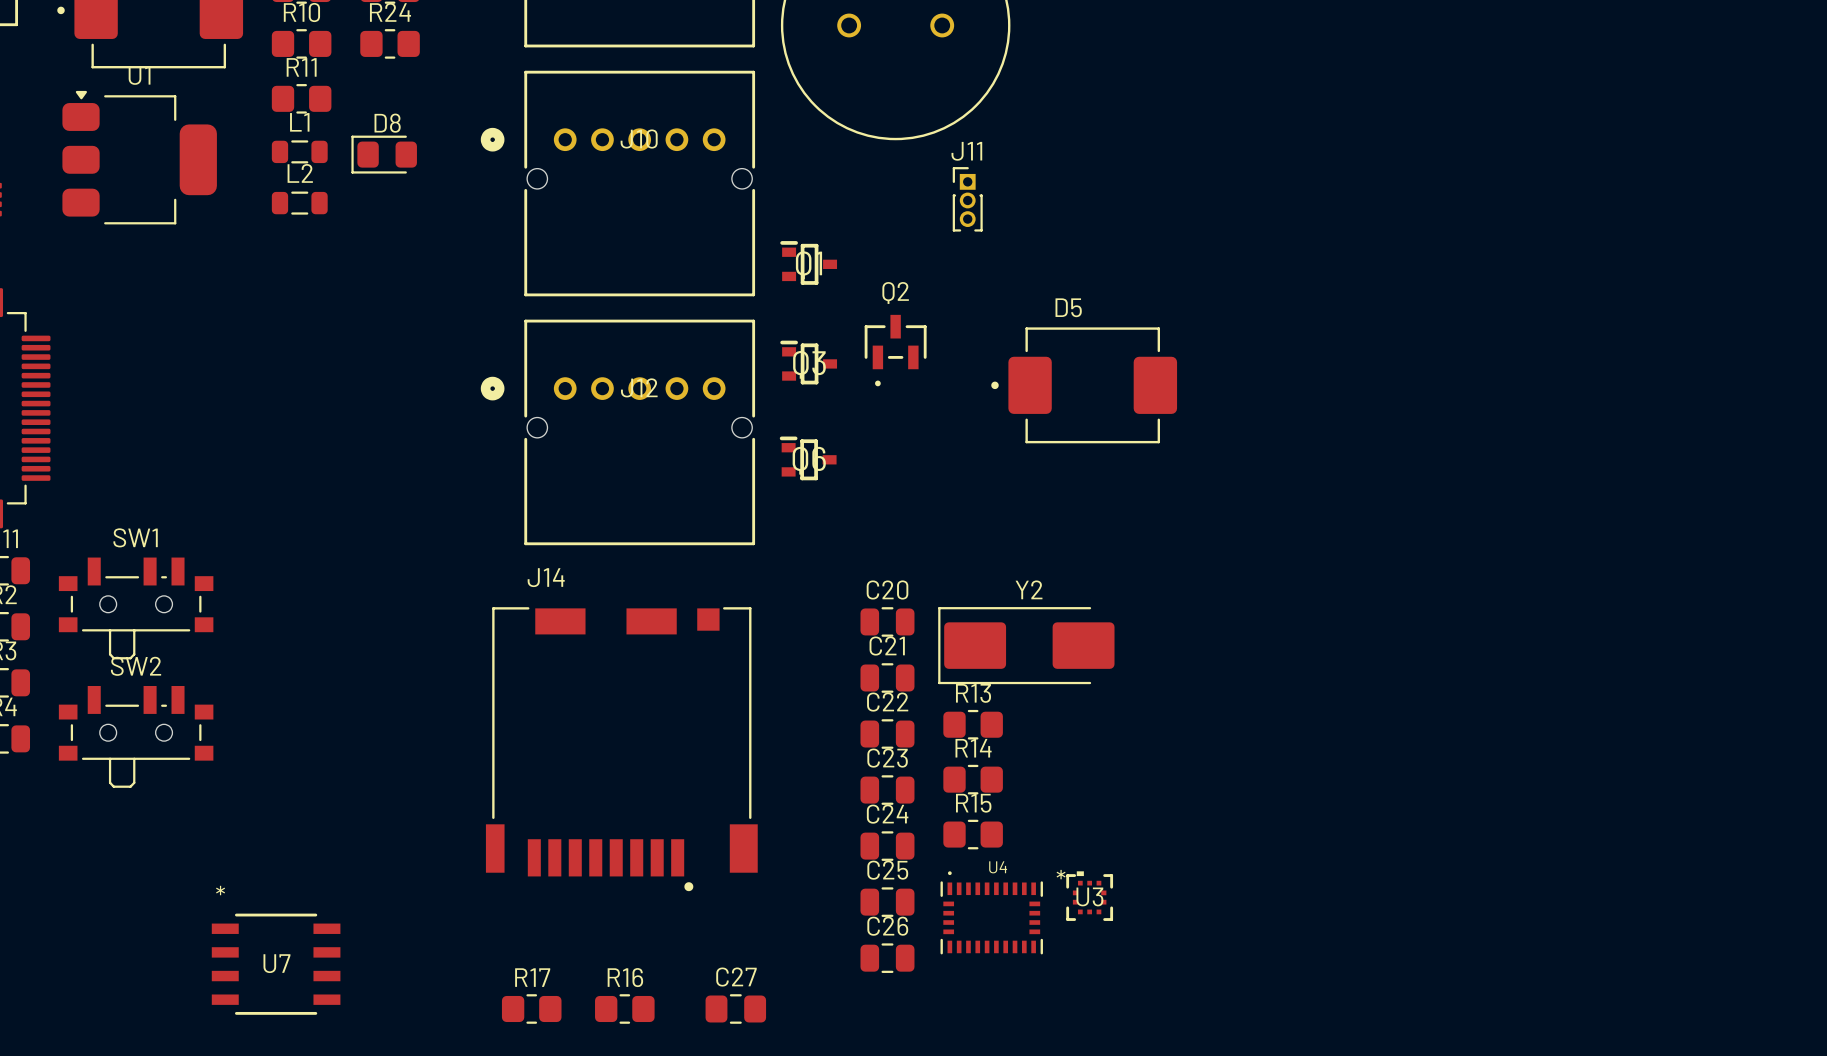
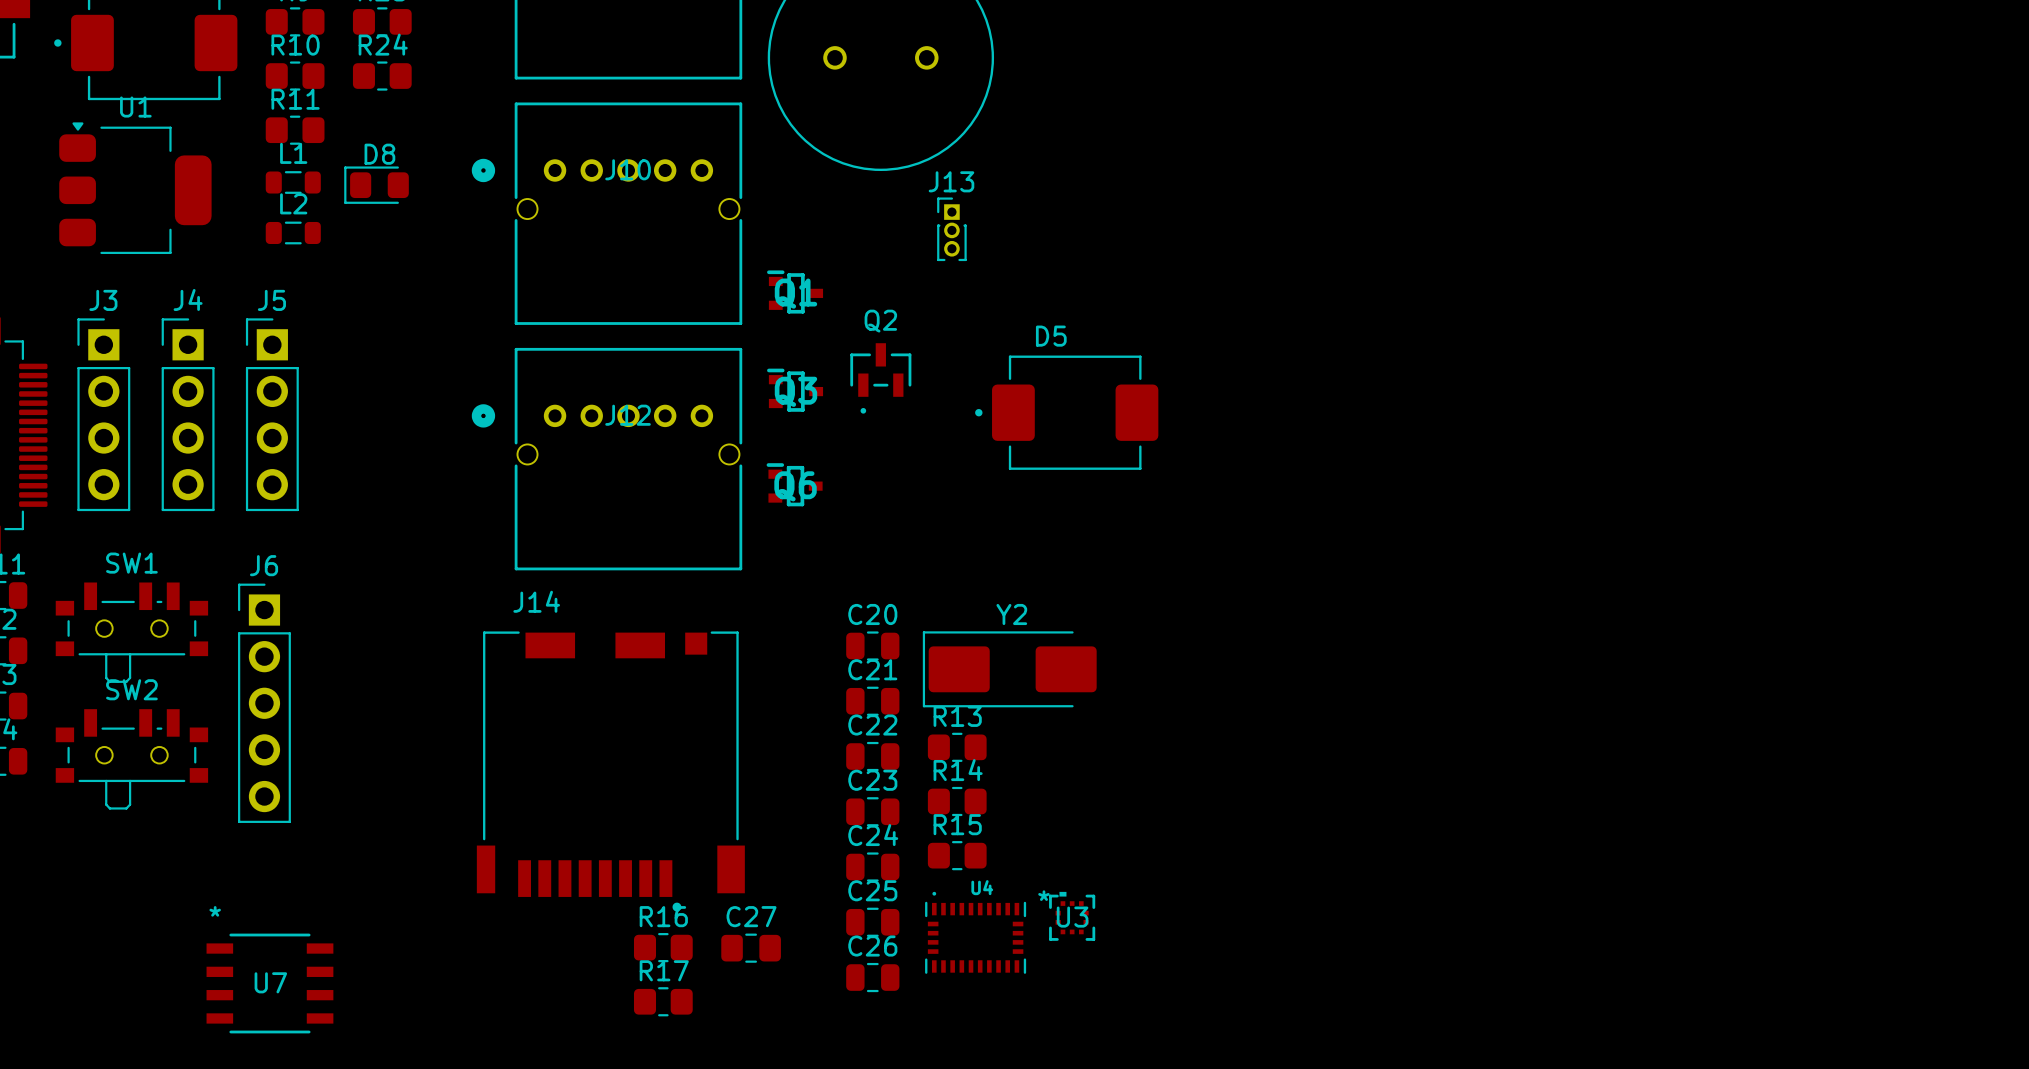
J11 name: J11 (966, 151) -> J13 (951, 181)
J3: none -> (103, 414)
J4: none -> (188, 414)
J5: none -> (272, 414)
J6: none -> (264, 703)
R17 position: (531, 1008) -> (663, 1001)
R16 position: (624, 1008) -> (663, 947)
C27 position: (735, 1008) -> (751, 948)

